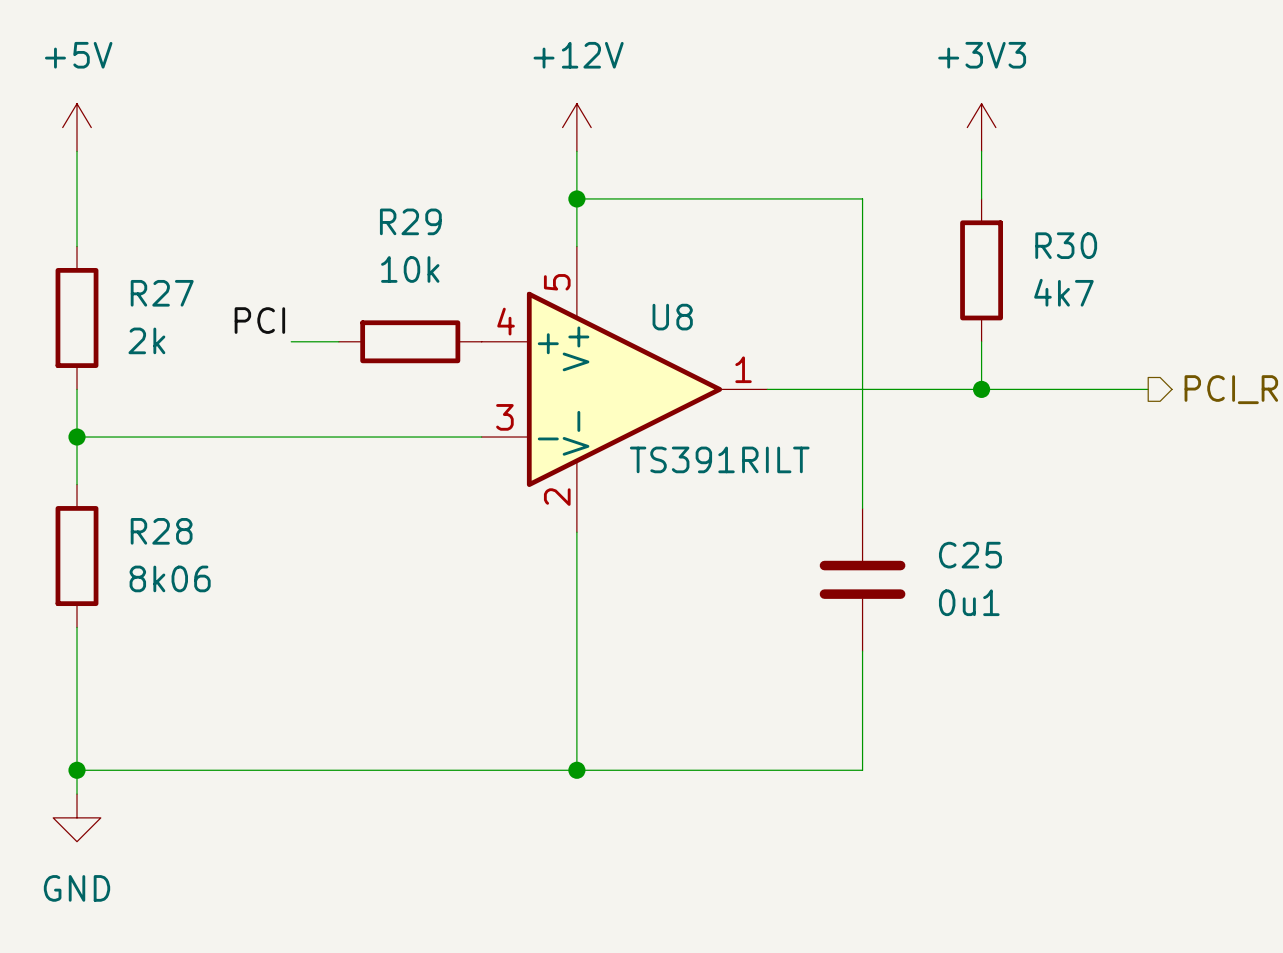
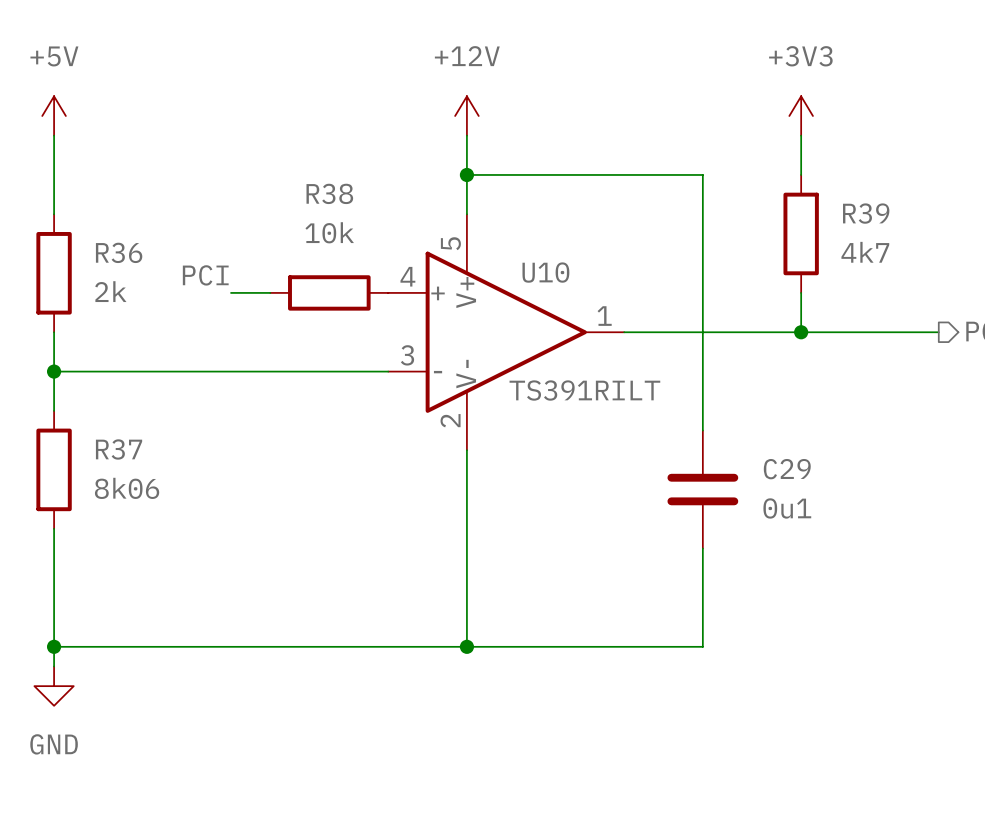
R29 name: R29 (410, 221) -> R38 (329, 193)
R30 name: R30 (1066, 245) -> R39 (866, 213)
R27 name: R27 (162, 293) -> R36 (119, 252)
U8 name: U8 (672, 317) -> U10 (545, 272)
R28 name: R28 (161, 531) -> R37 (119, 449)
C25 name: C25 (970, 555) -> C29 (787, 469)

